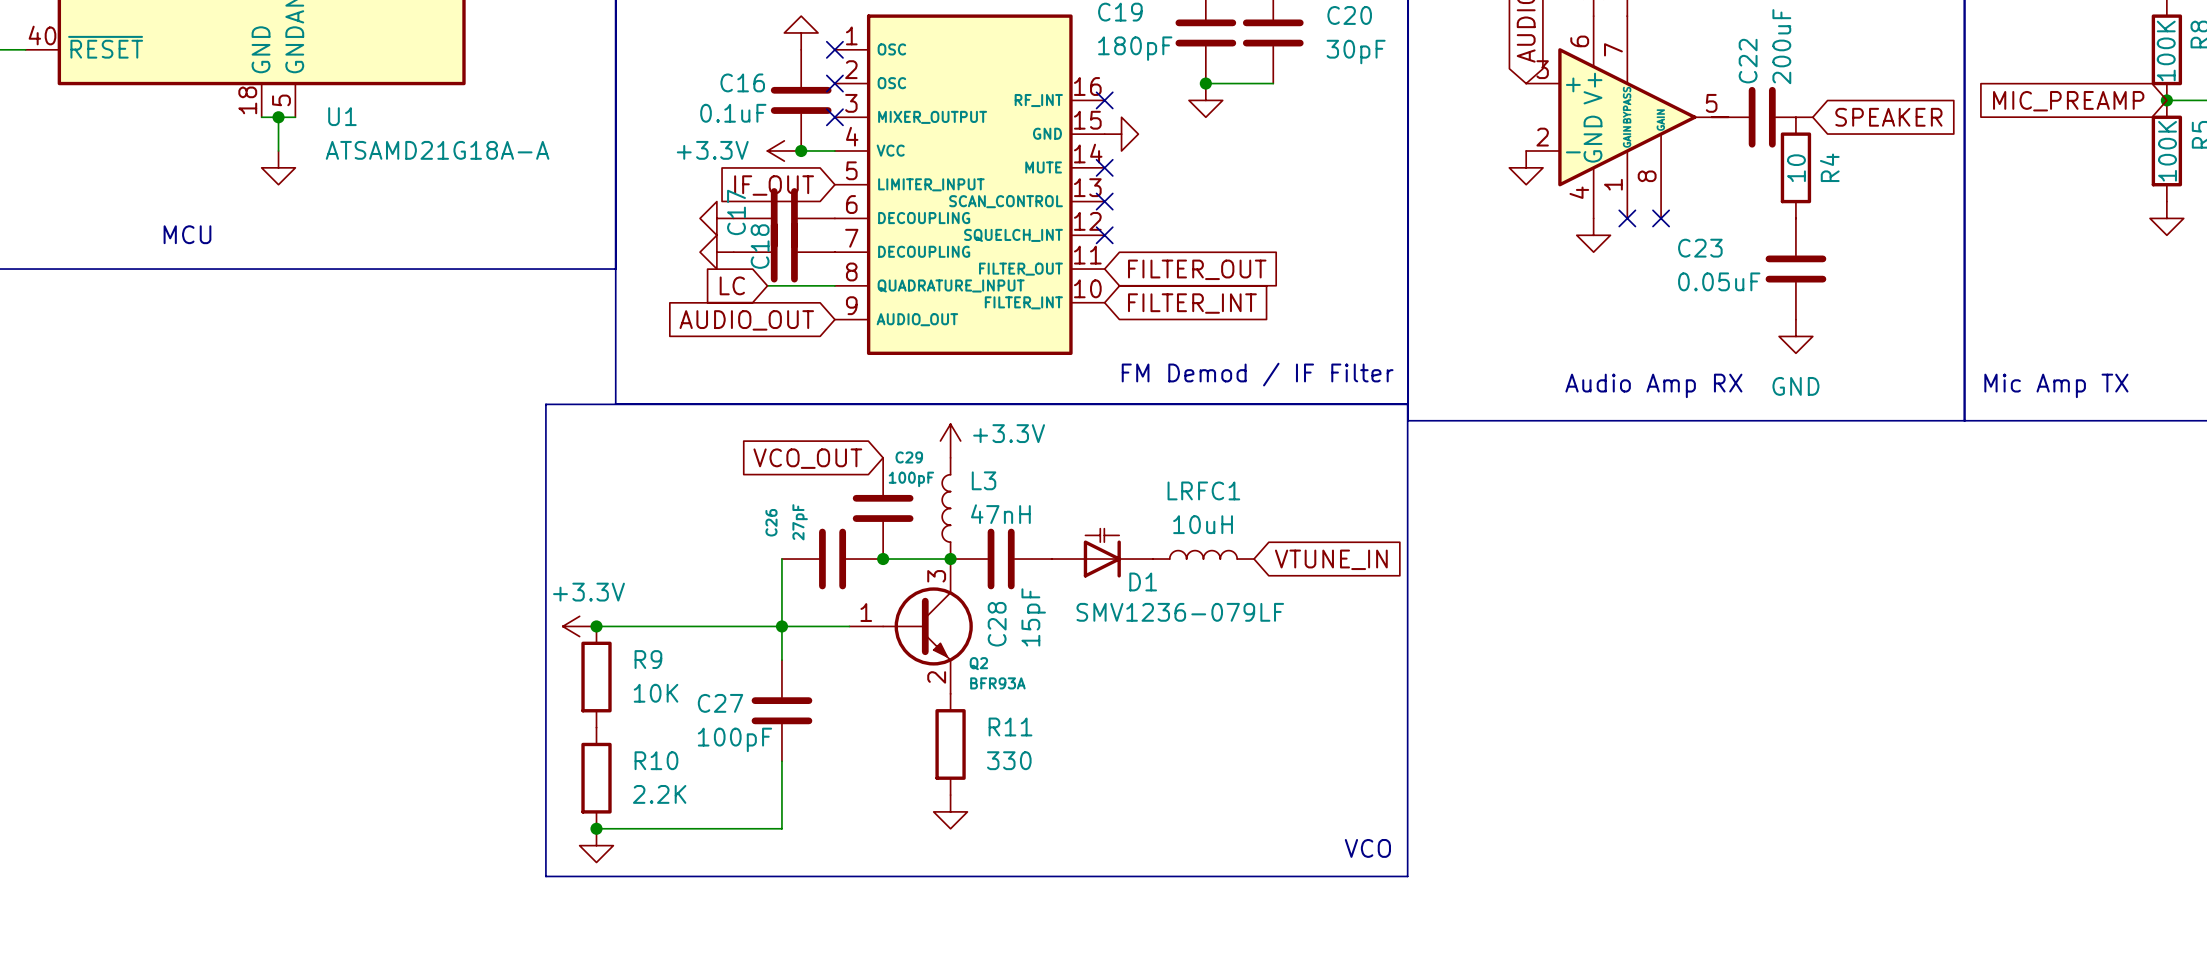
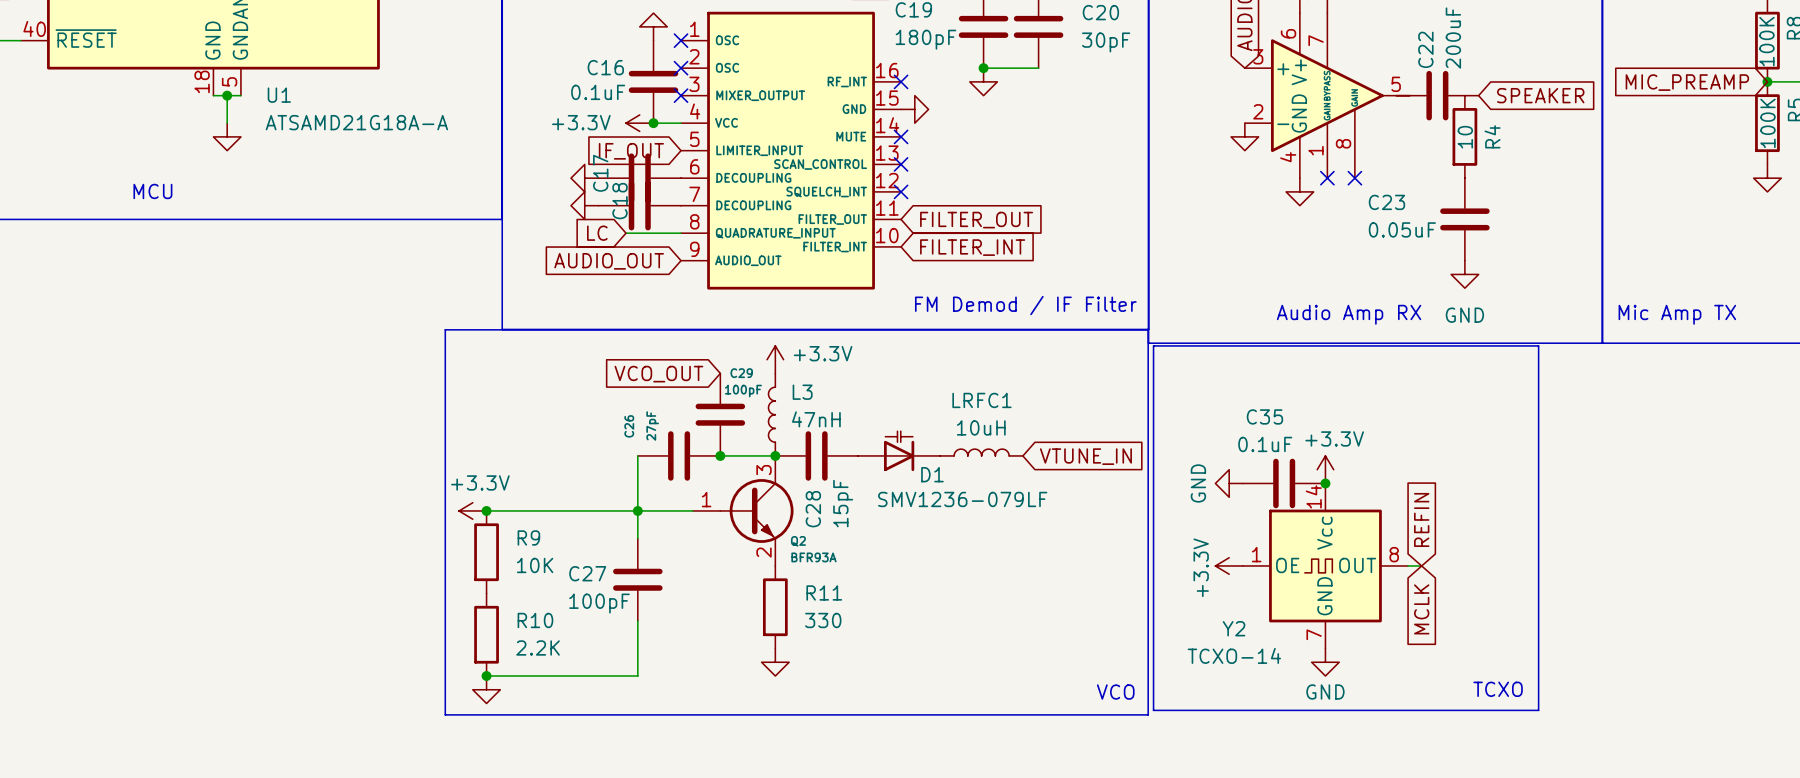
line: none -> (1153, 345) (1538, 345) (1538, 710) (1153, 710) (1153, 345)
power symbol: none -> +3.3V (1325, 469)
power symbol: none -> GND (1229, 483)
C35: none -> 0.1uF (1284, 483)
junction: none -> (1325, 483)
global label: none -> REFIN (1421, 519)
power symbol: none -> +3.3V (1229, 565)
Y2: none -> TCXO-14 (1325, 565)
wire: none -> (1407, 565) (1421, 565)
global label: none -> MCLK (1421, 609)
power symbol: none -> GND (1325, 662)
text: none -> TCXO (1498, 689)

